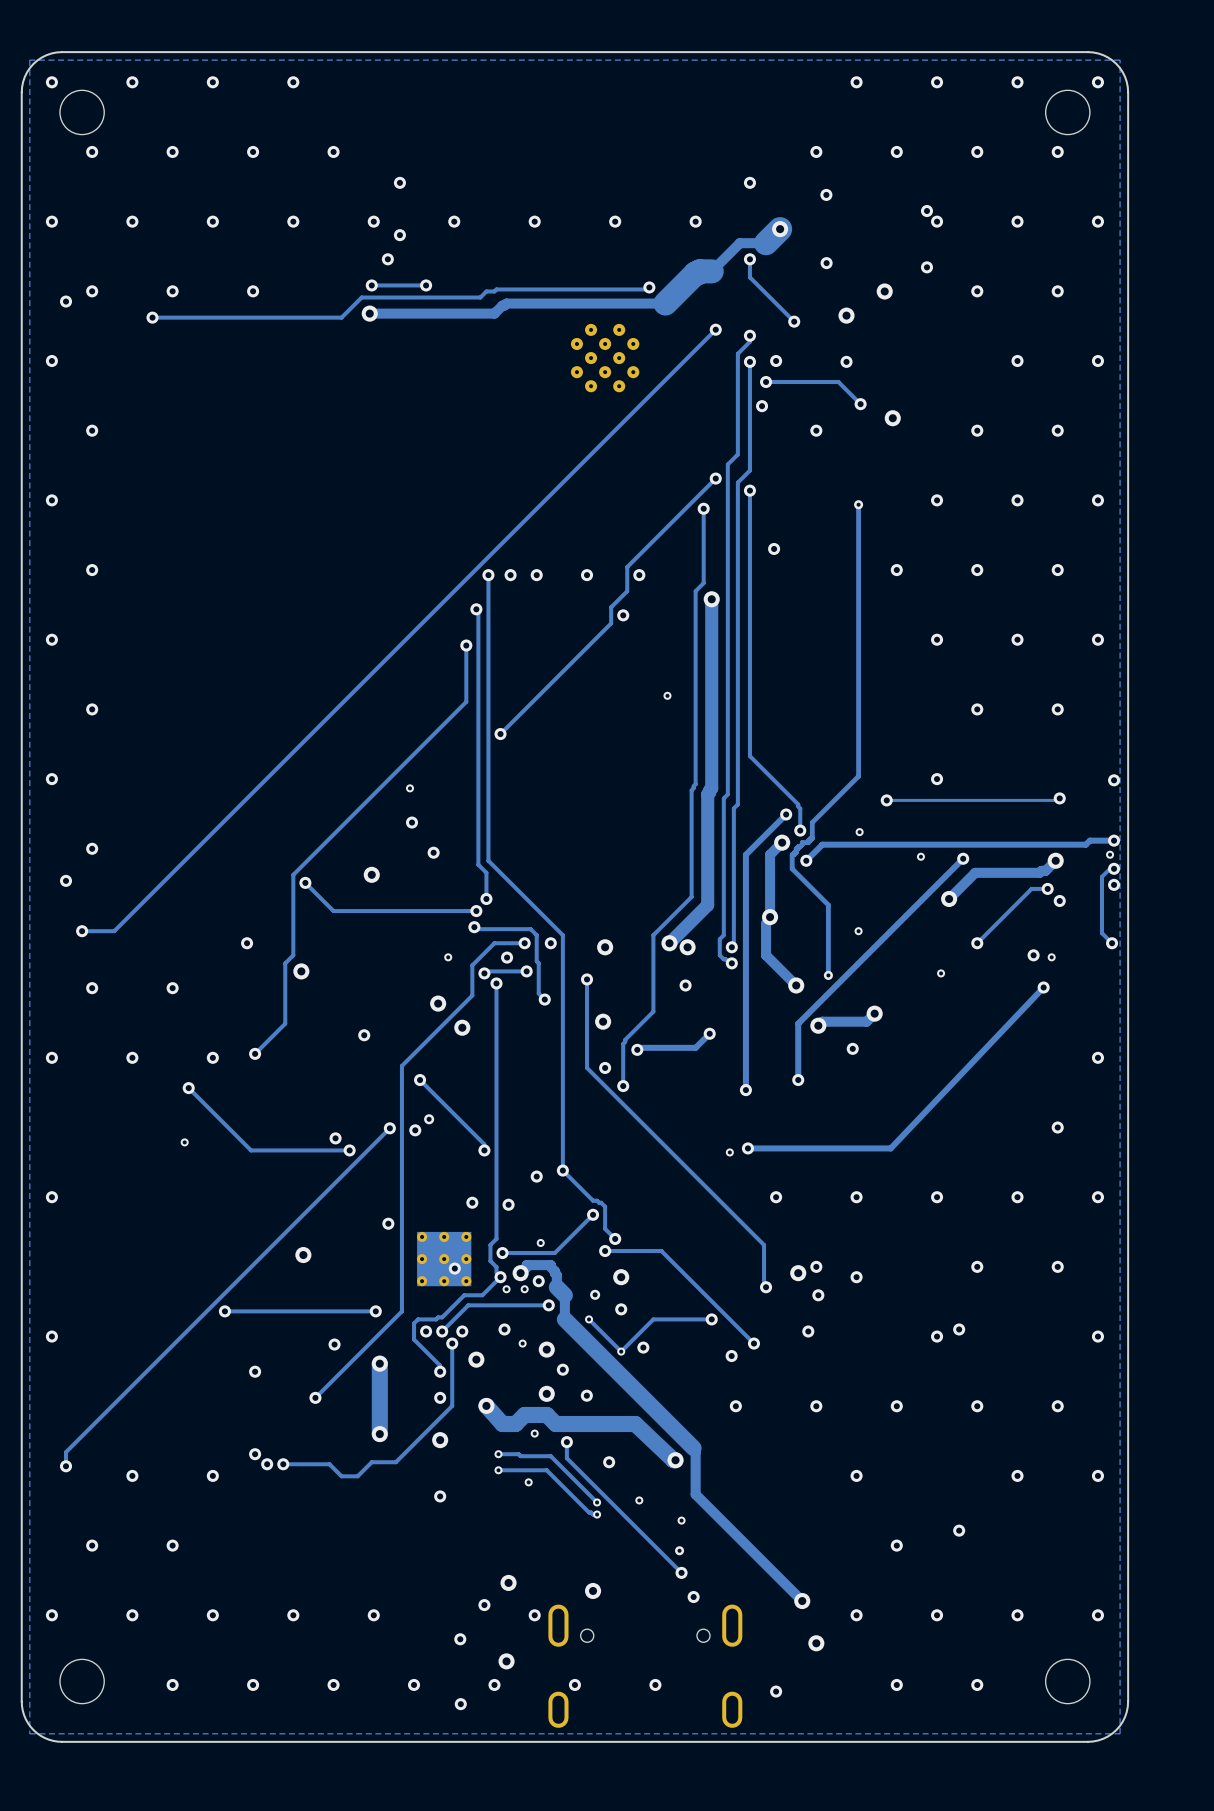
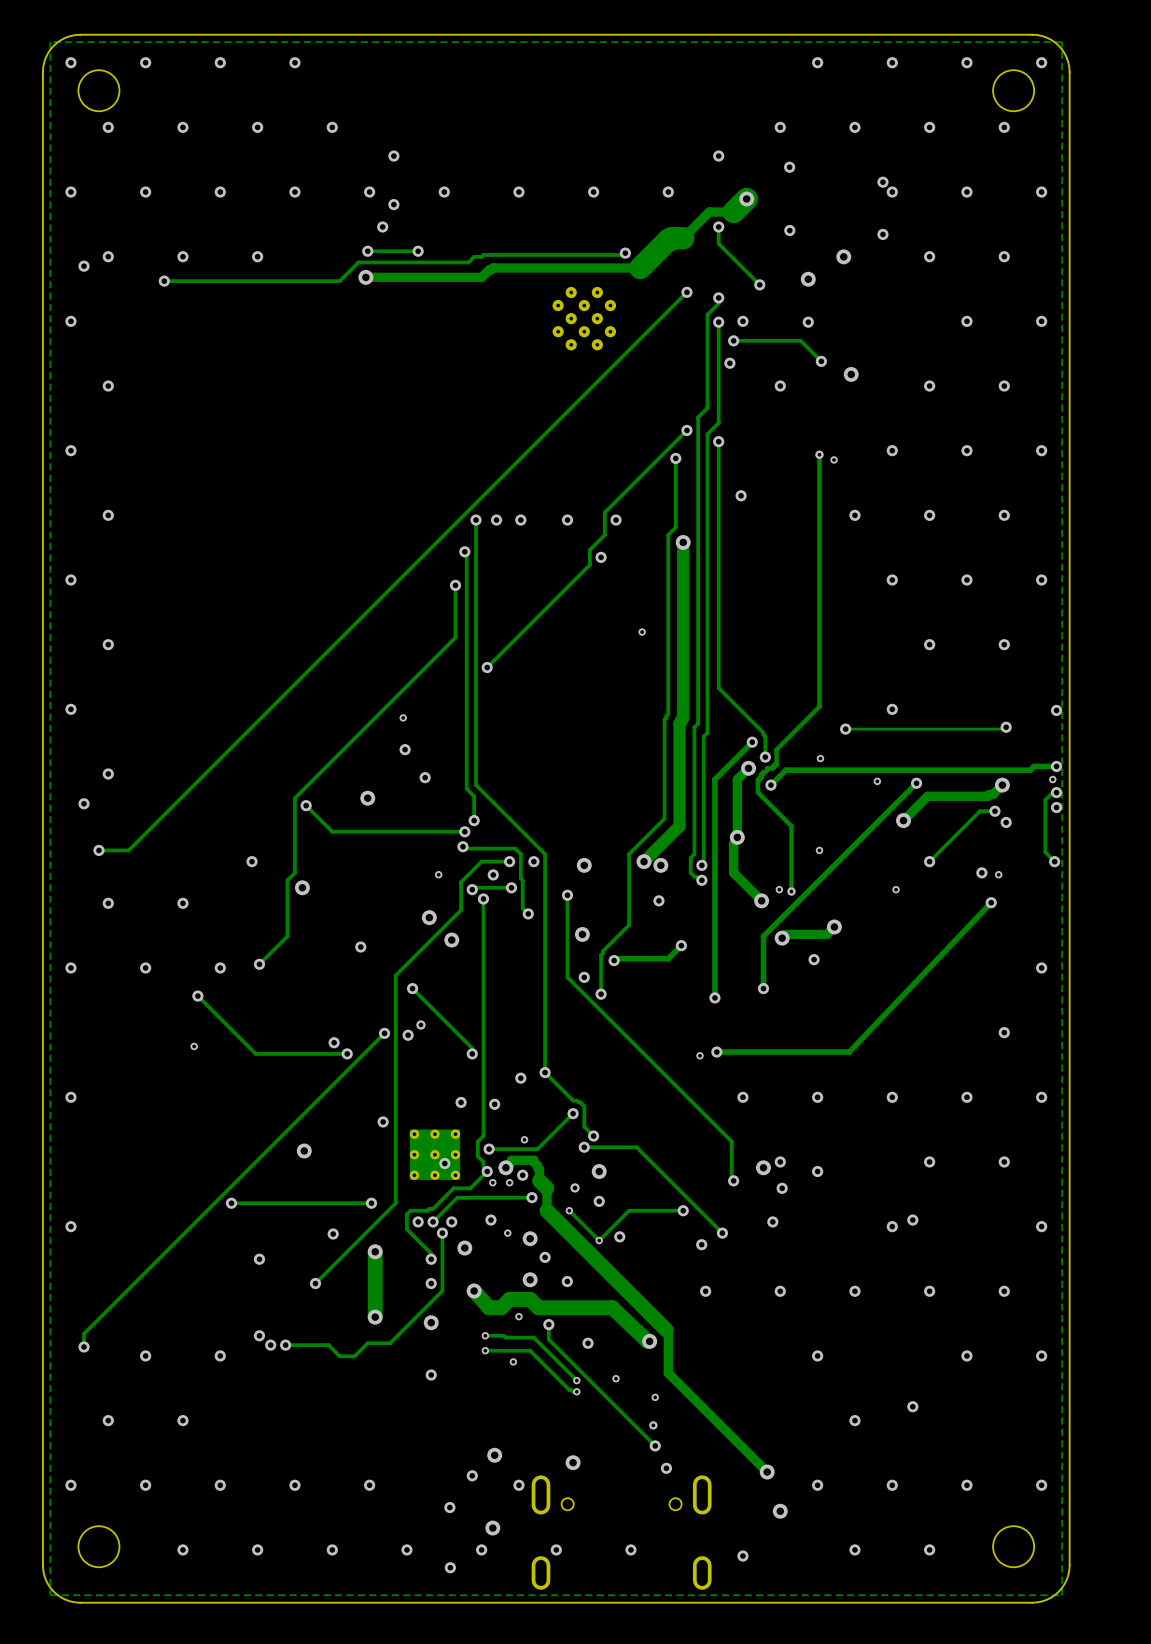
via: none -> (834, 459)
via: none -> (779, 889)

